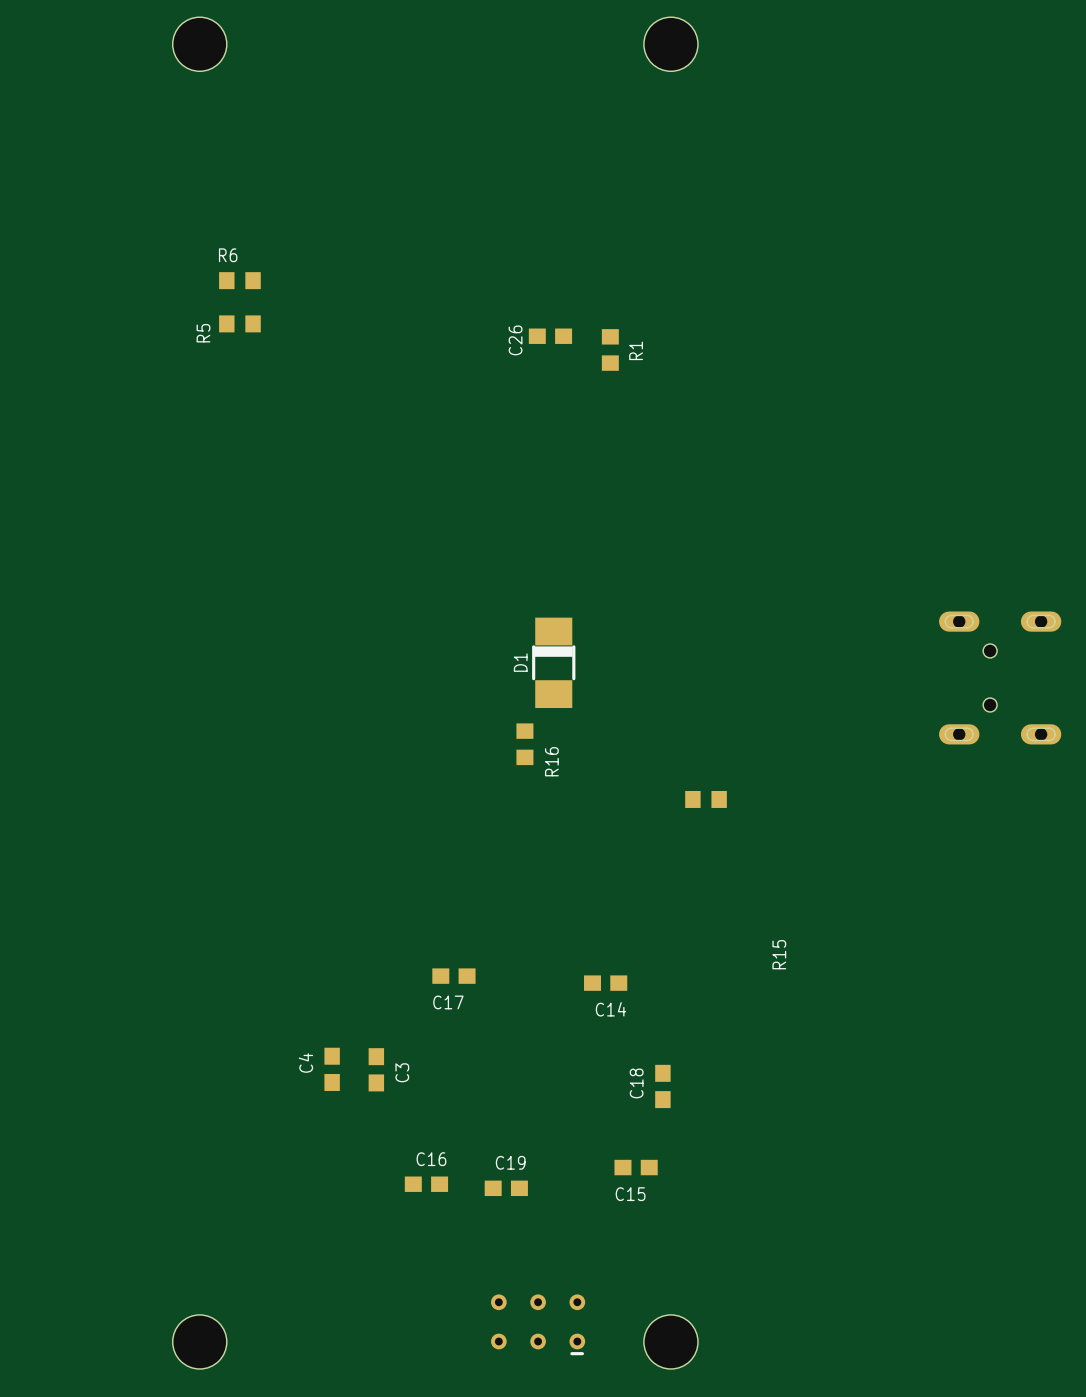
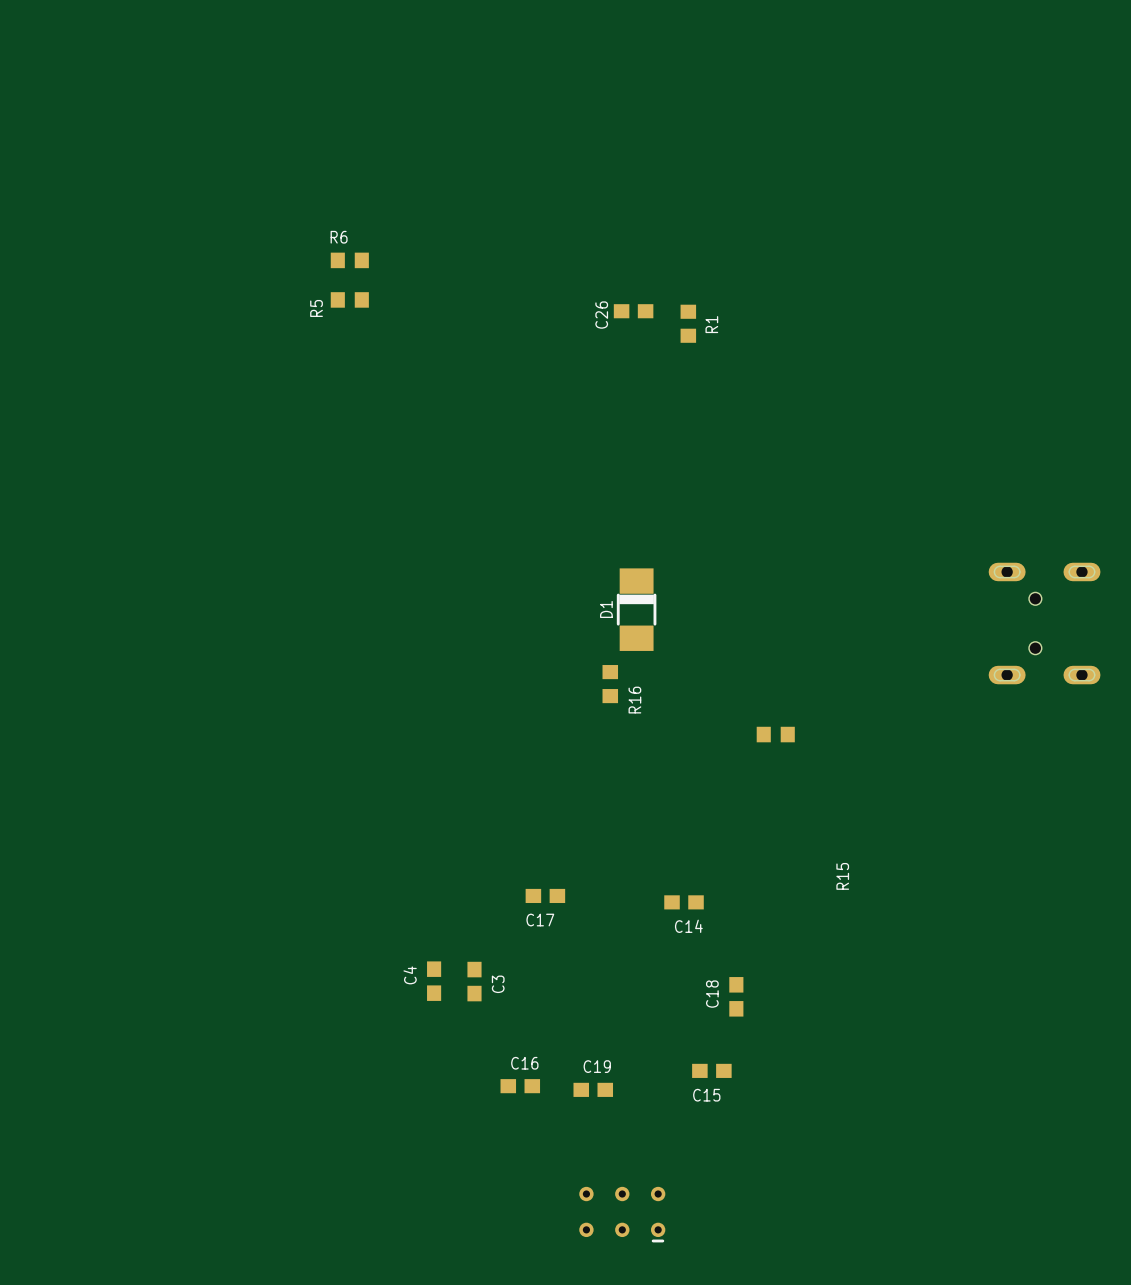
hole: (199, 44) -> none
hole: (670, 44) -> none
hole: (199, 1341) -> none
hole: (670, 1341) -> none

